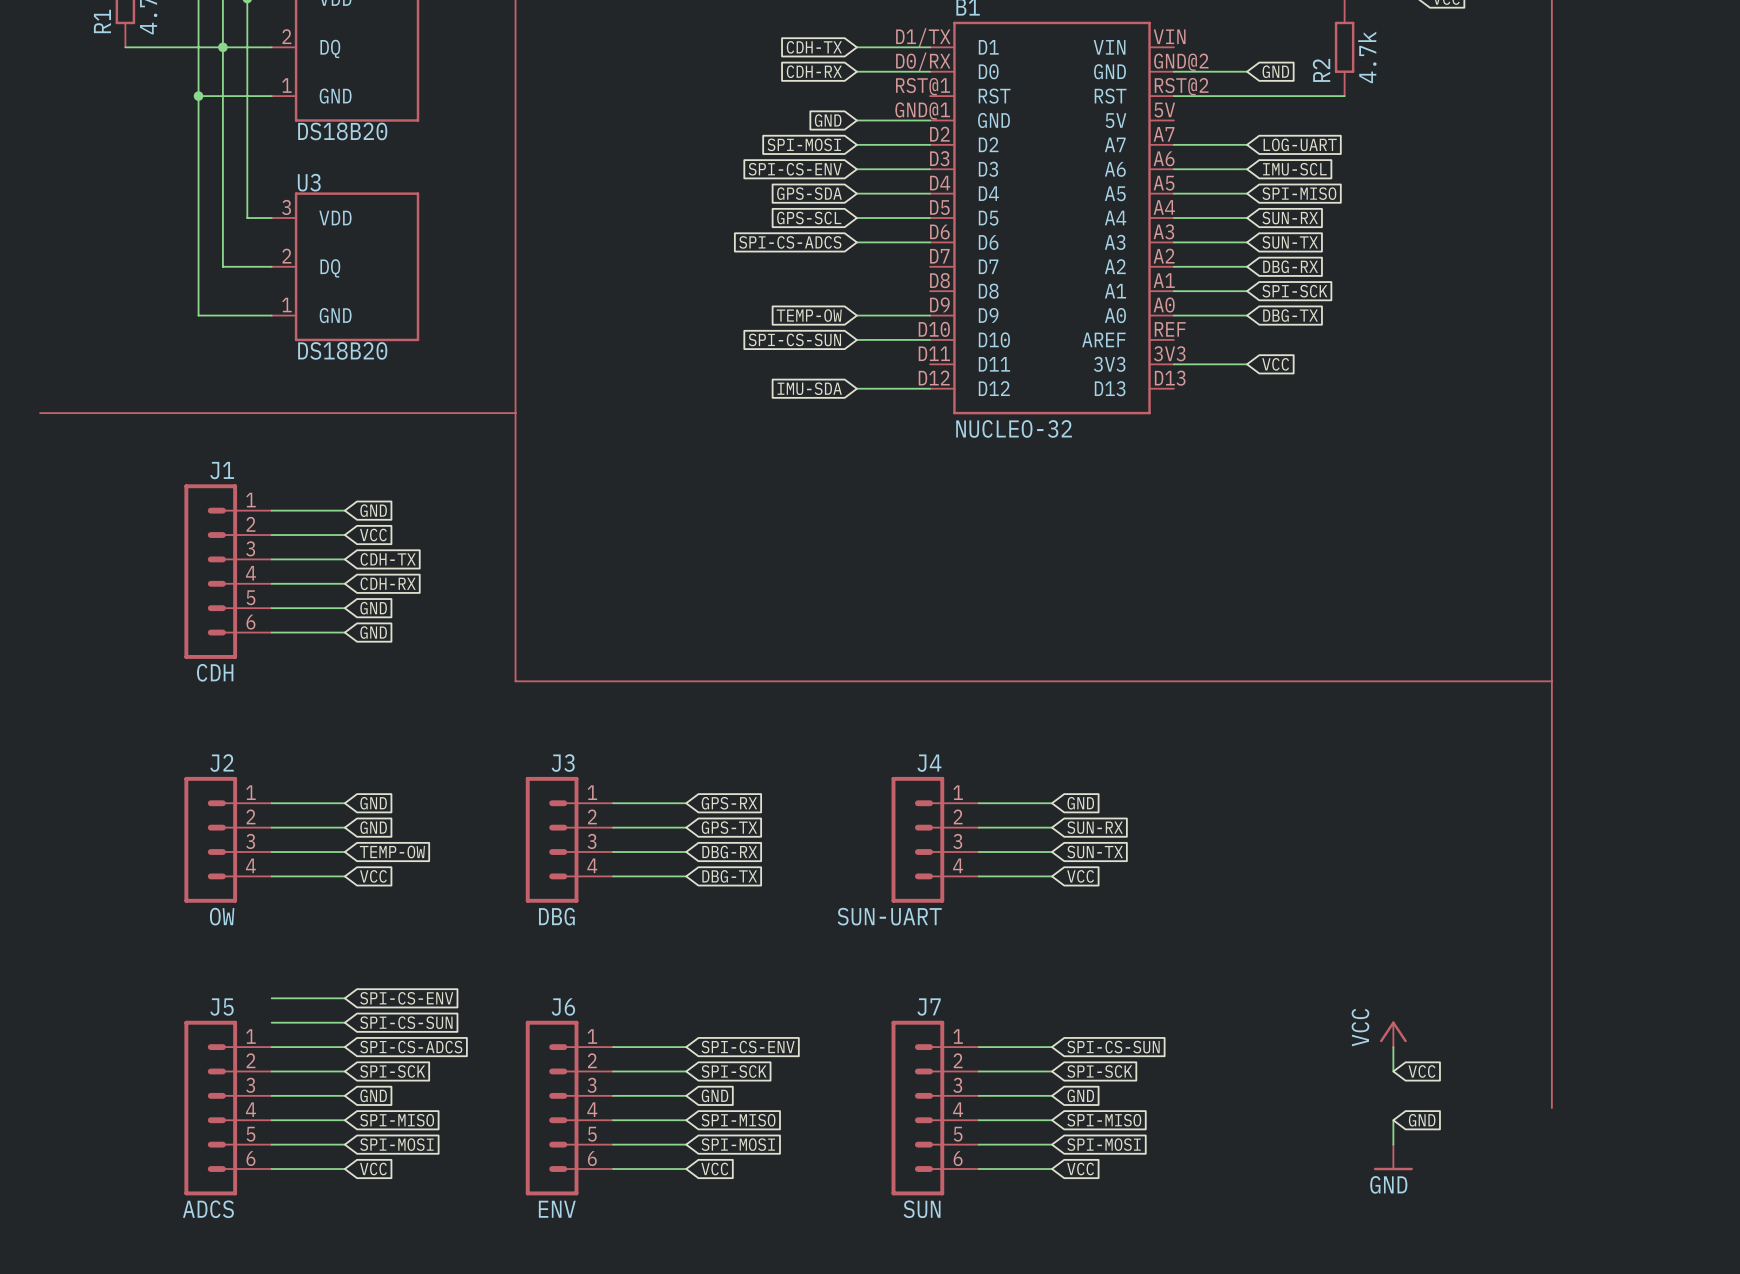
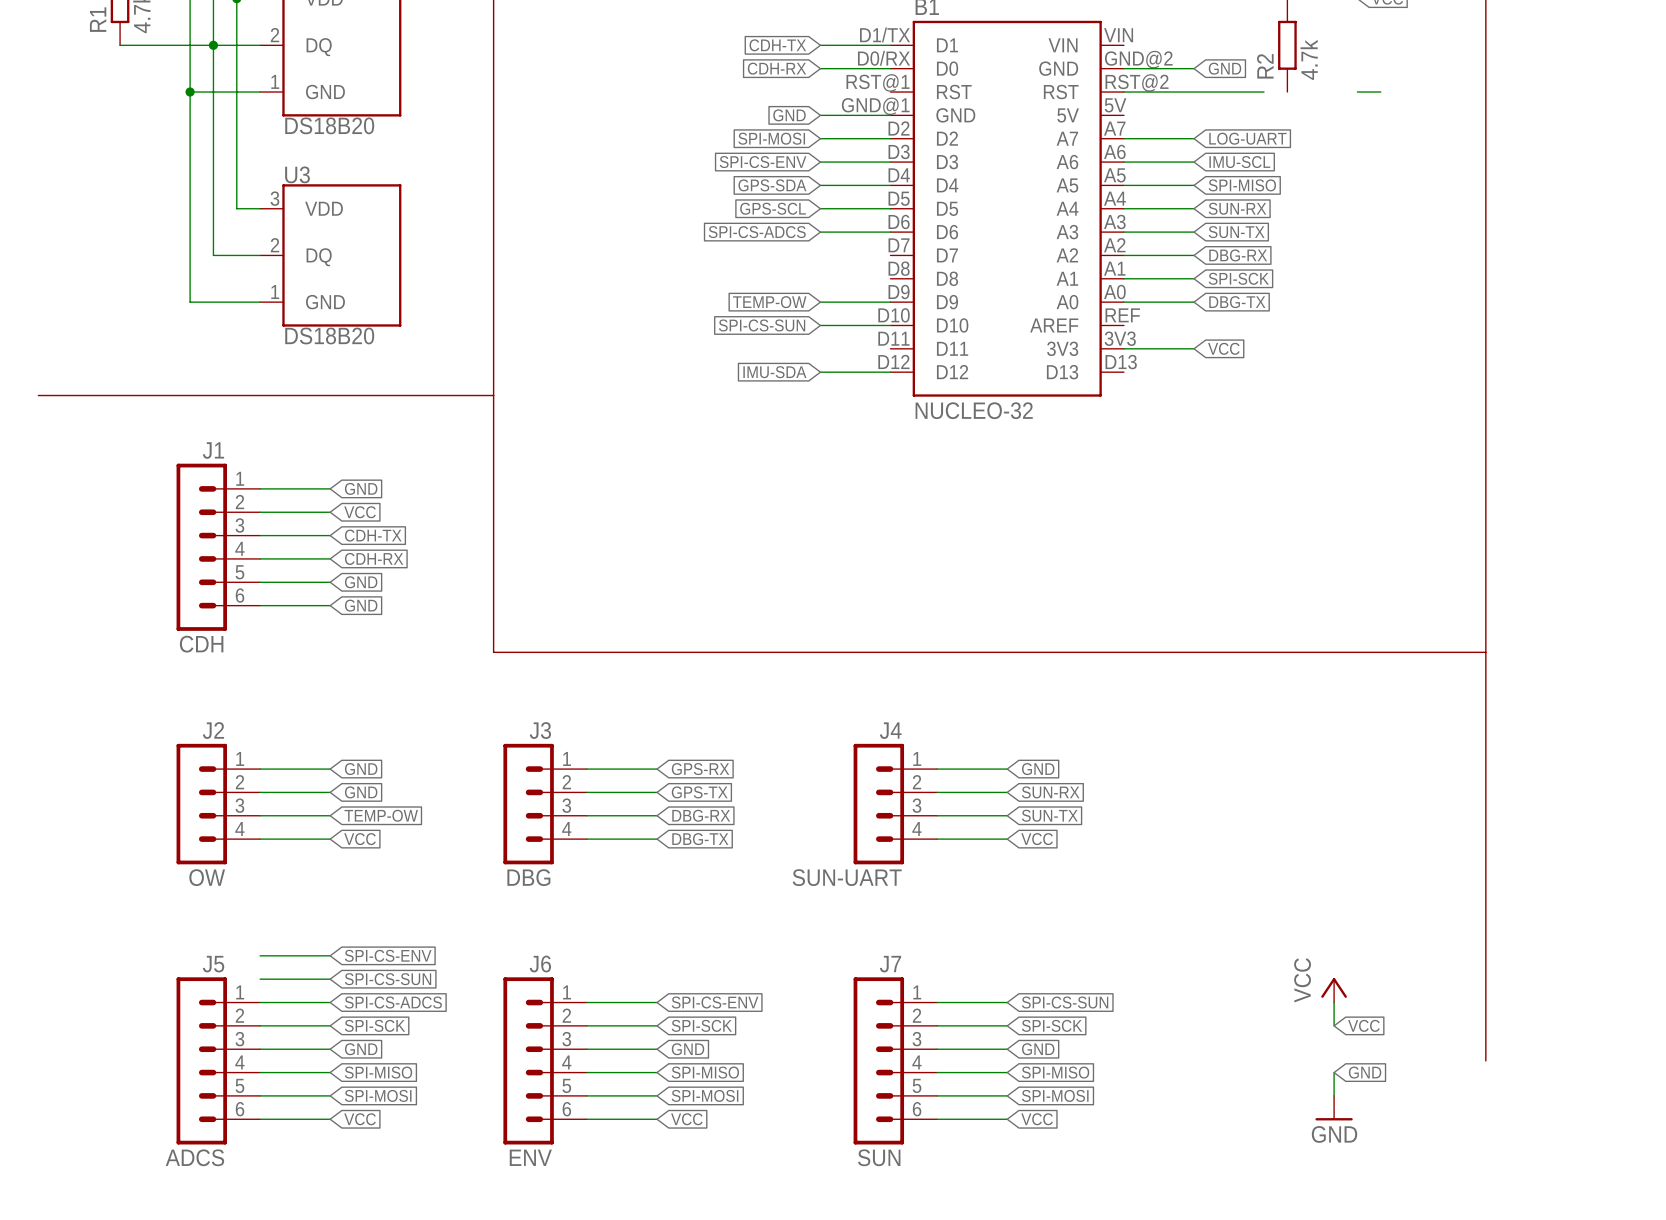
wire: (1320, 96) (1344, 96) -> (1357, 92) (1380, 92)

